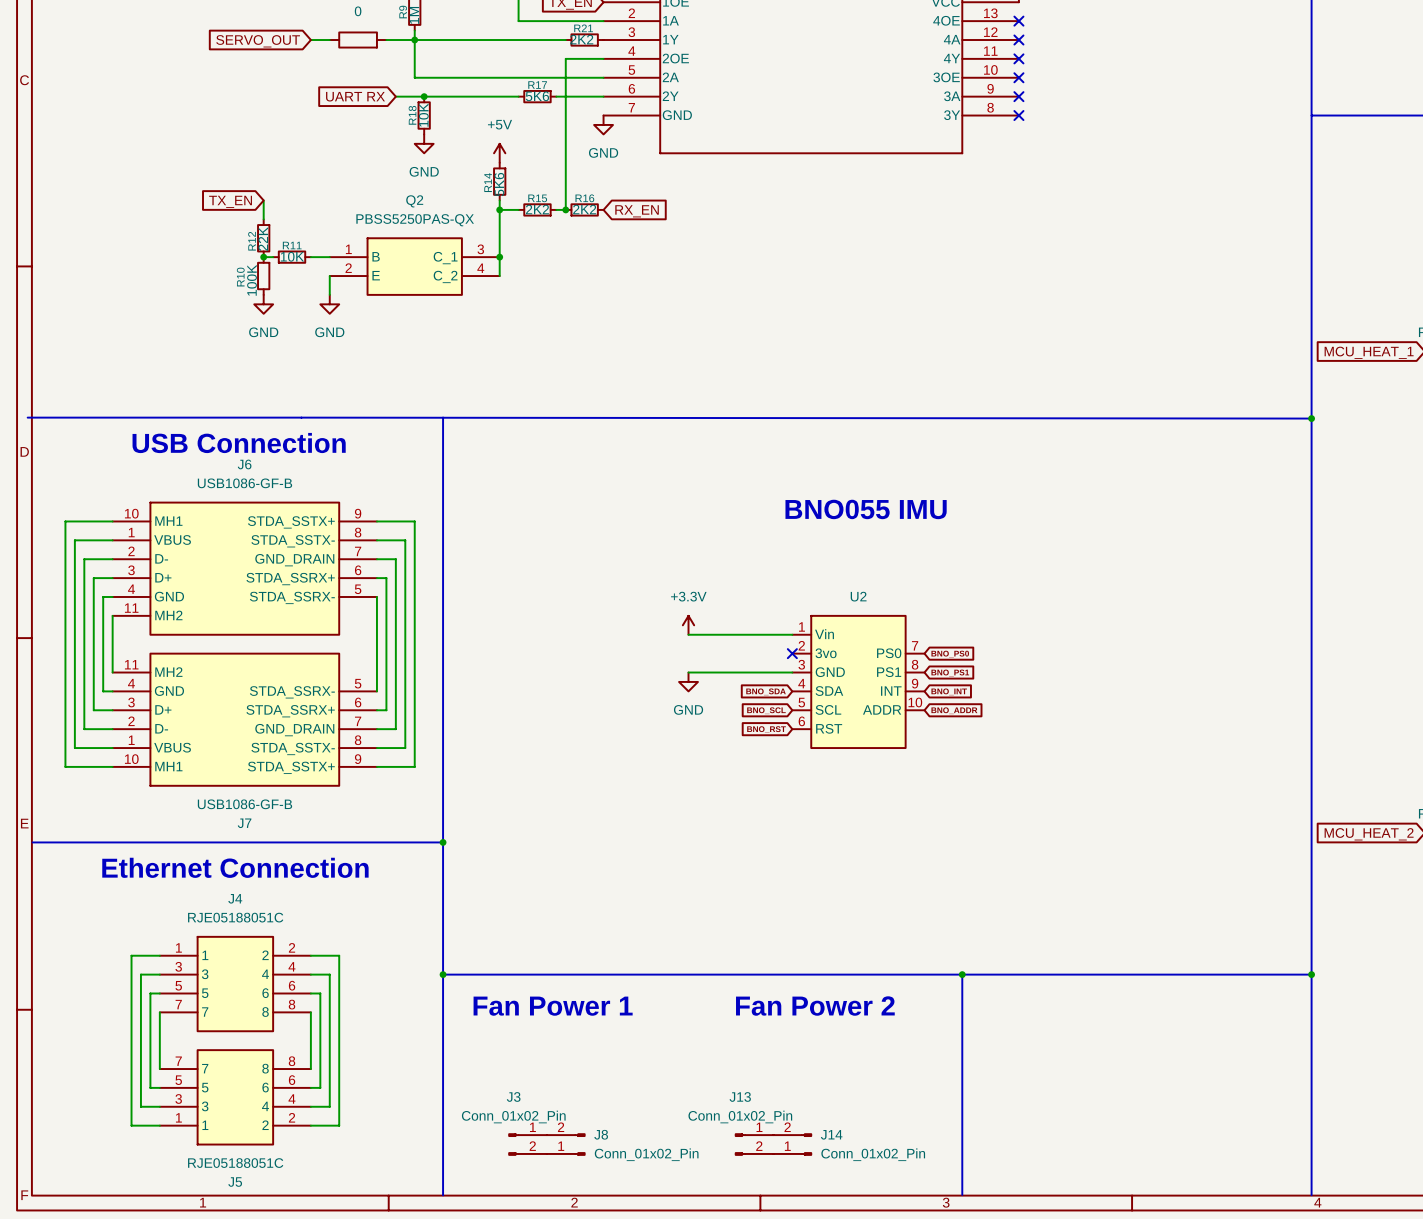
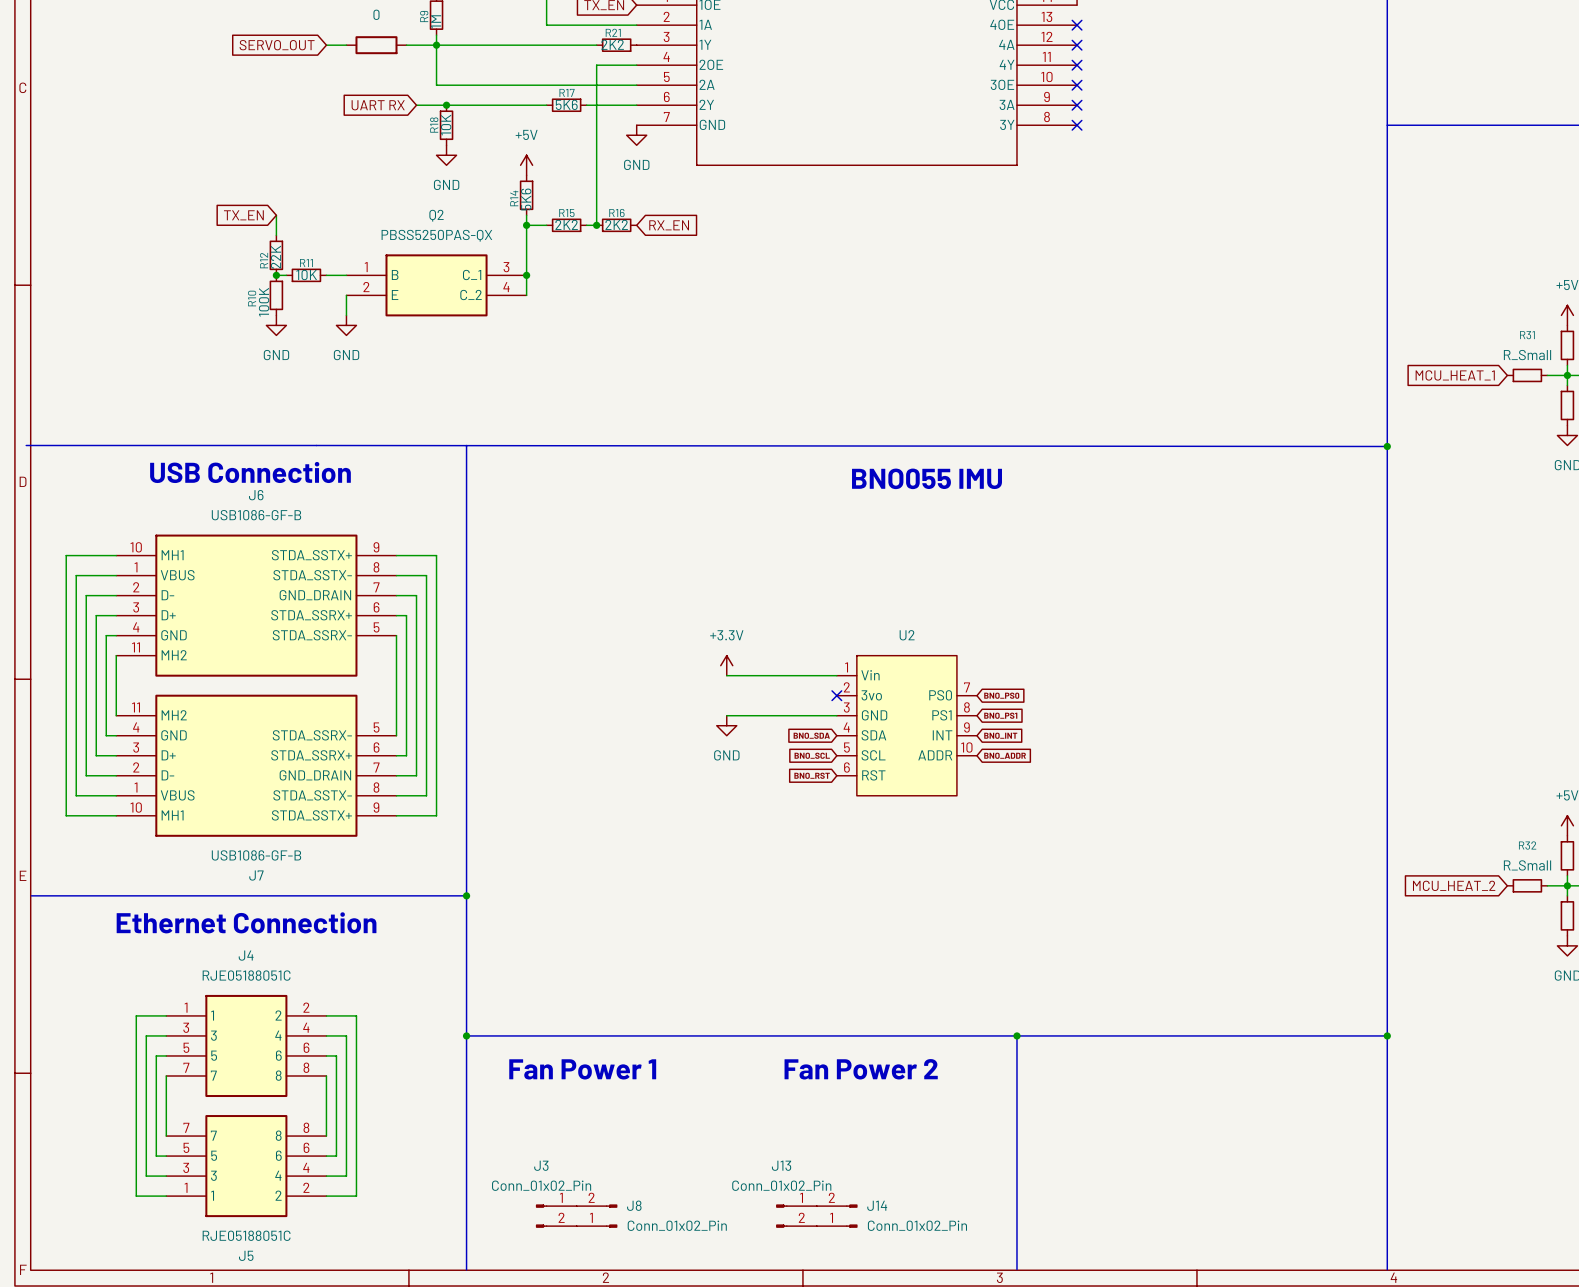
text position: BNO055 IMU (866, 509) -> BNO055 IMU (927, 478)

